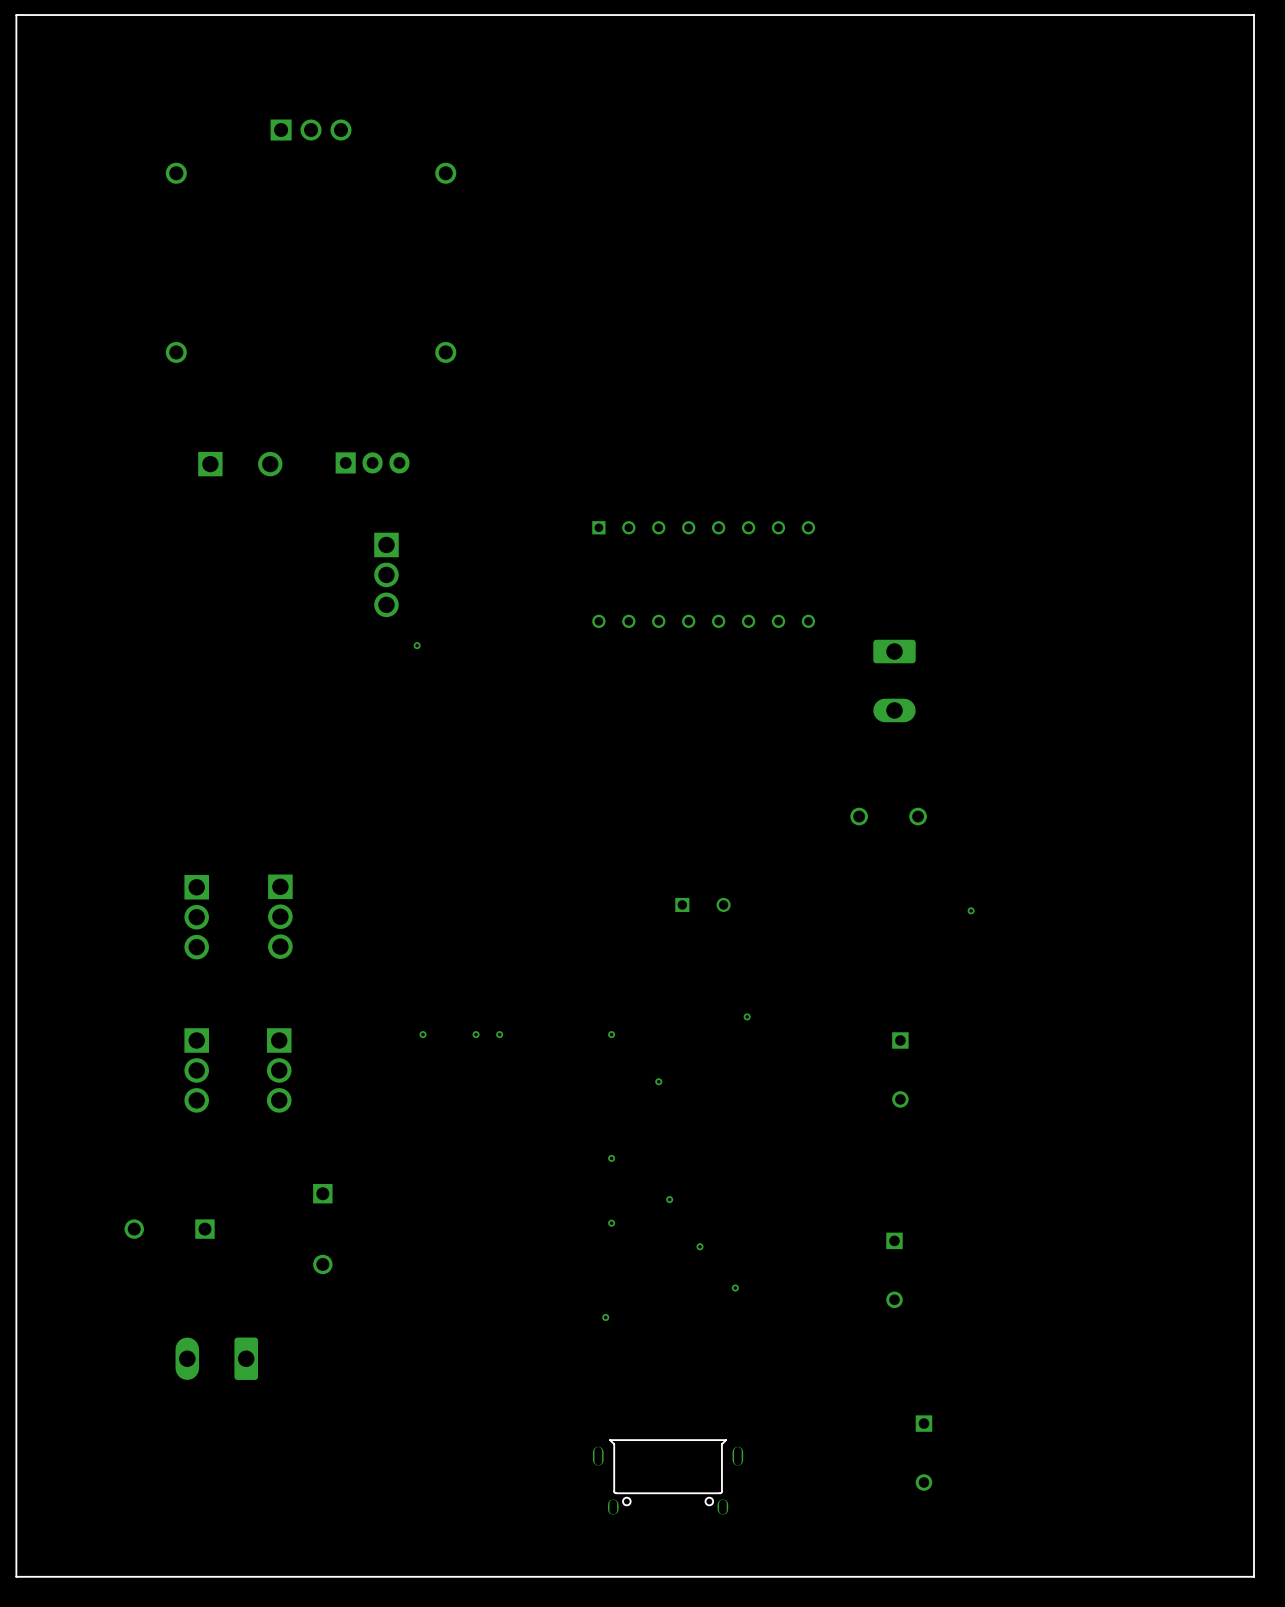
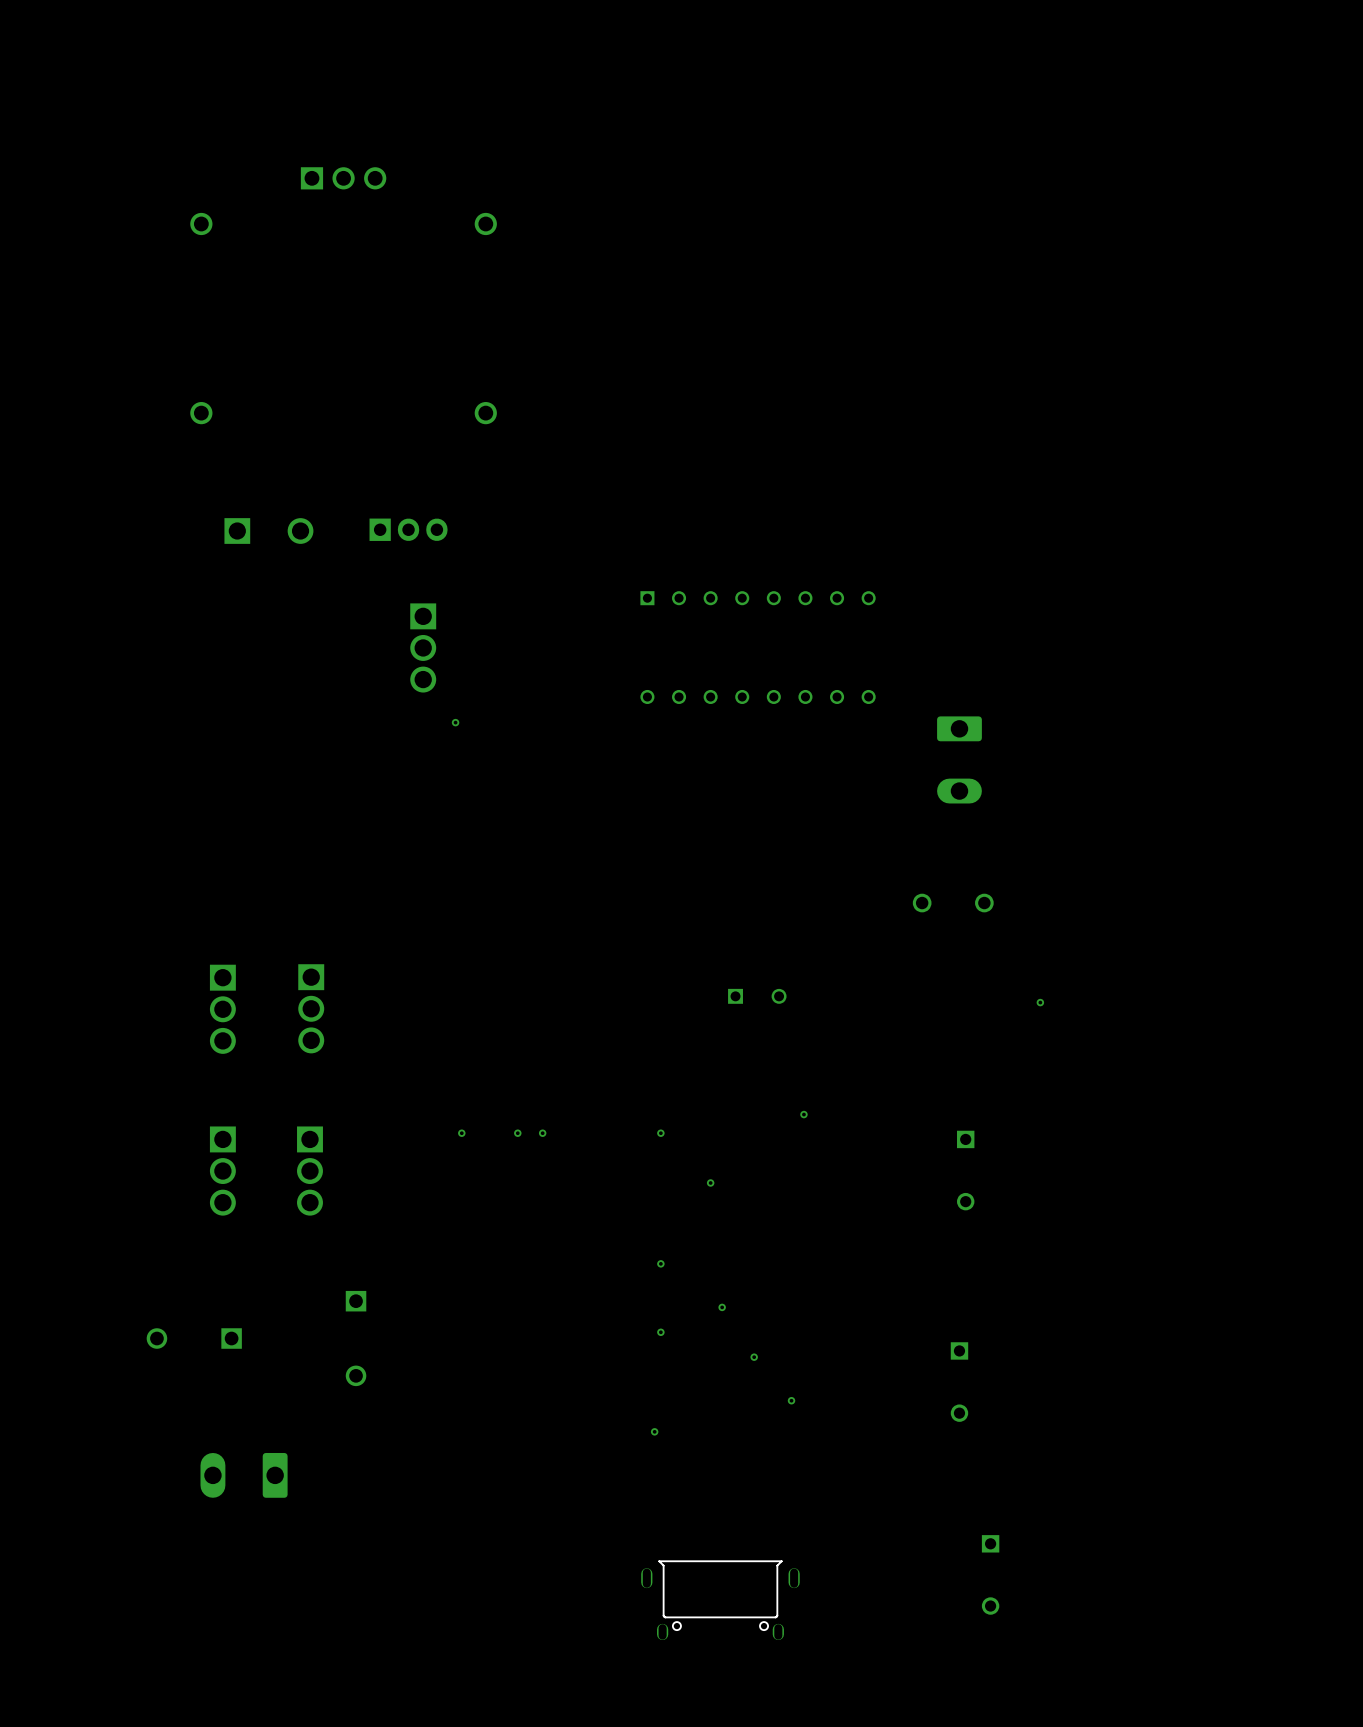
board edge: (1254, 15) (16, 15) (16, 1576) (1254, 1576) (1254, 15) -> none

